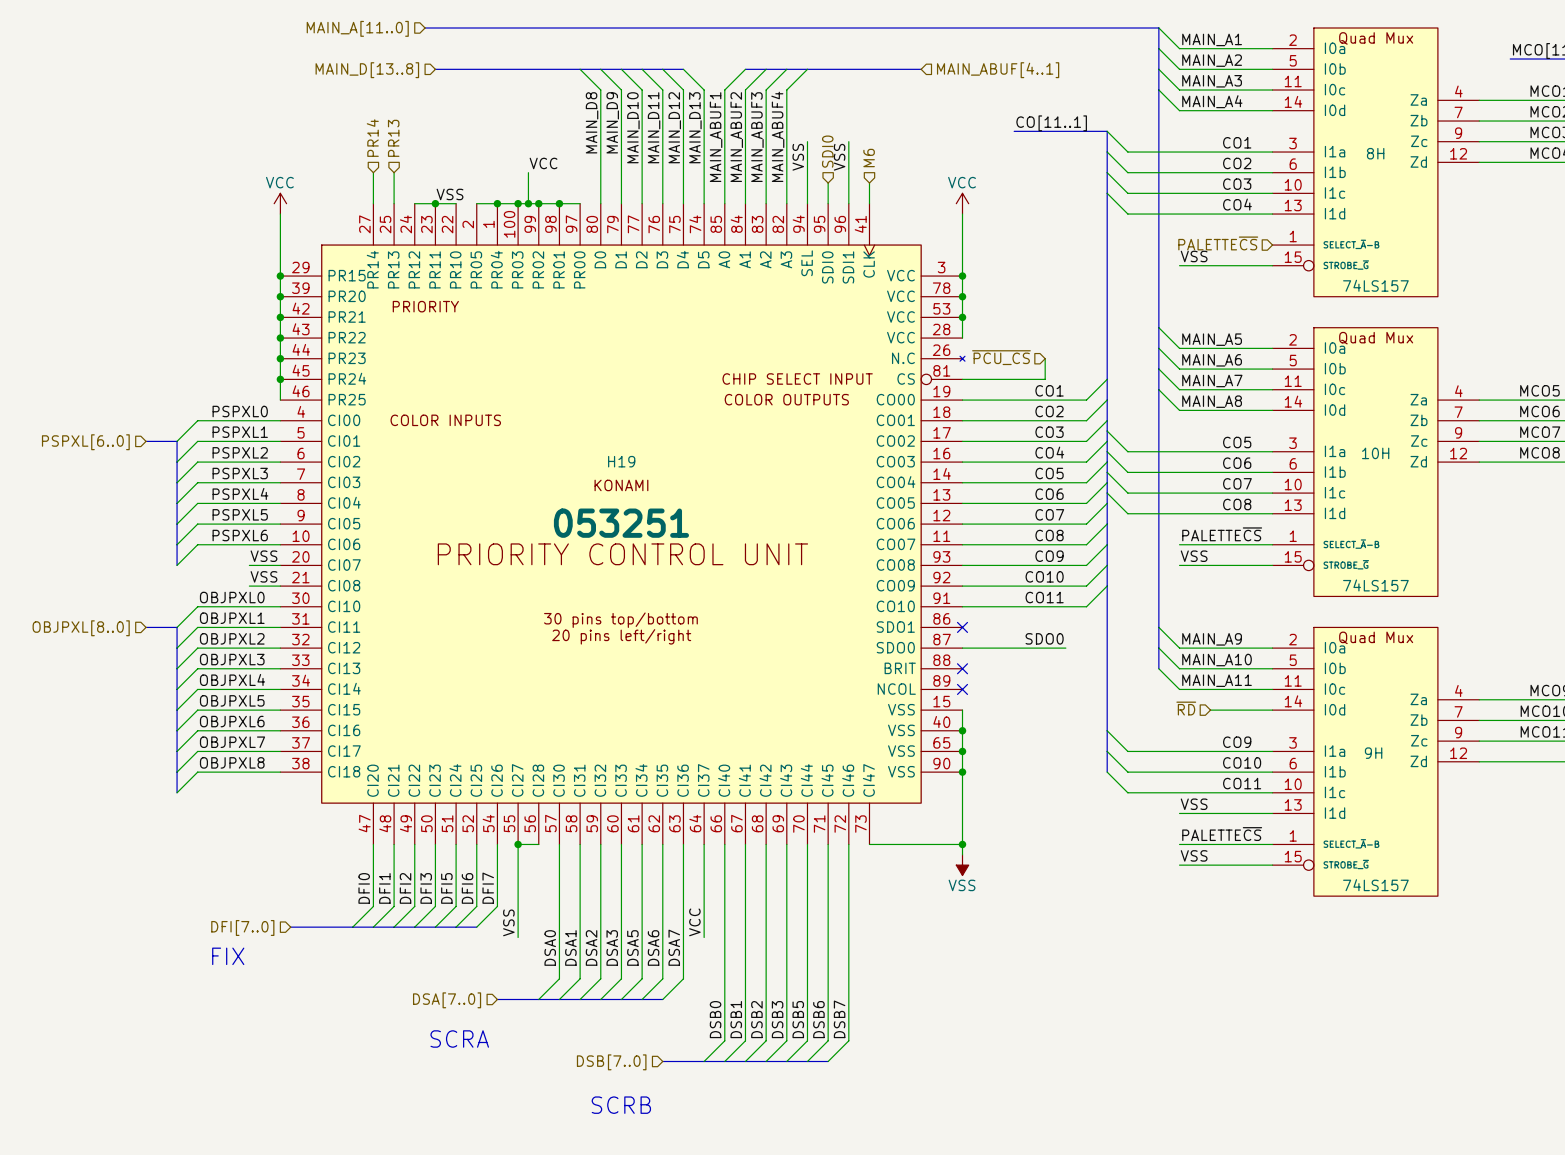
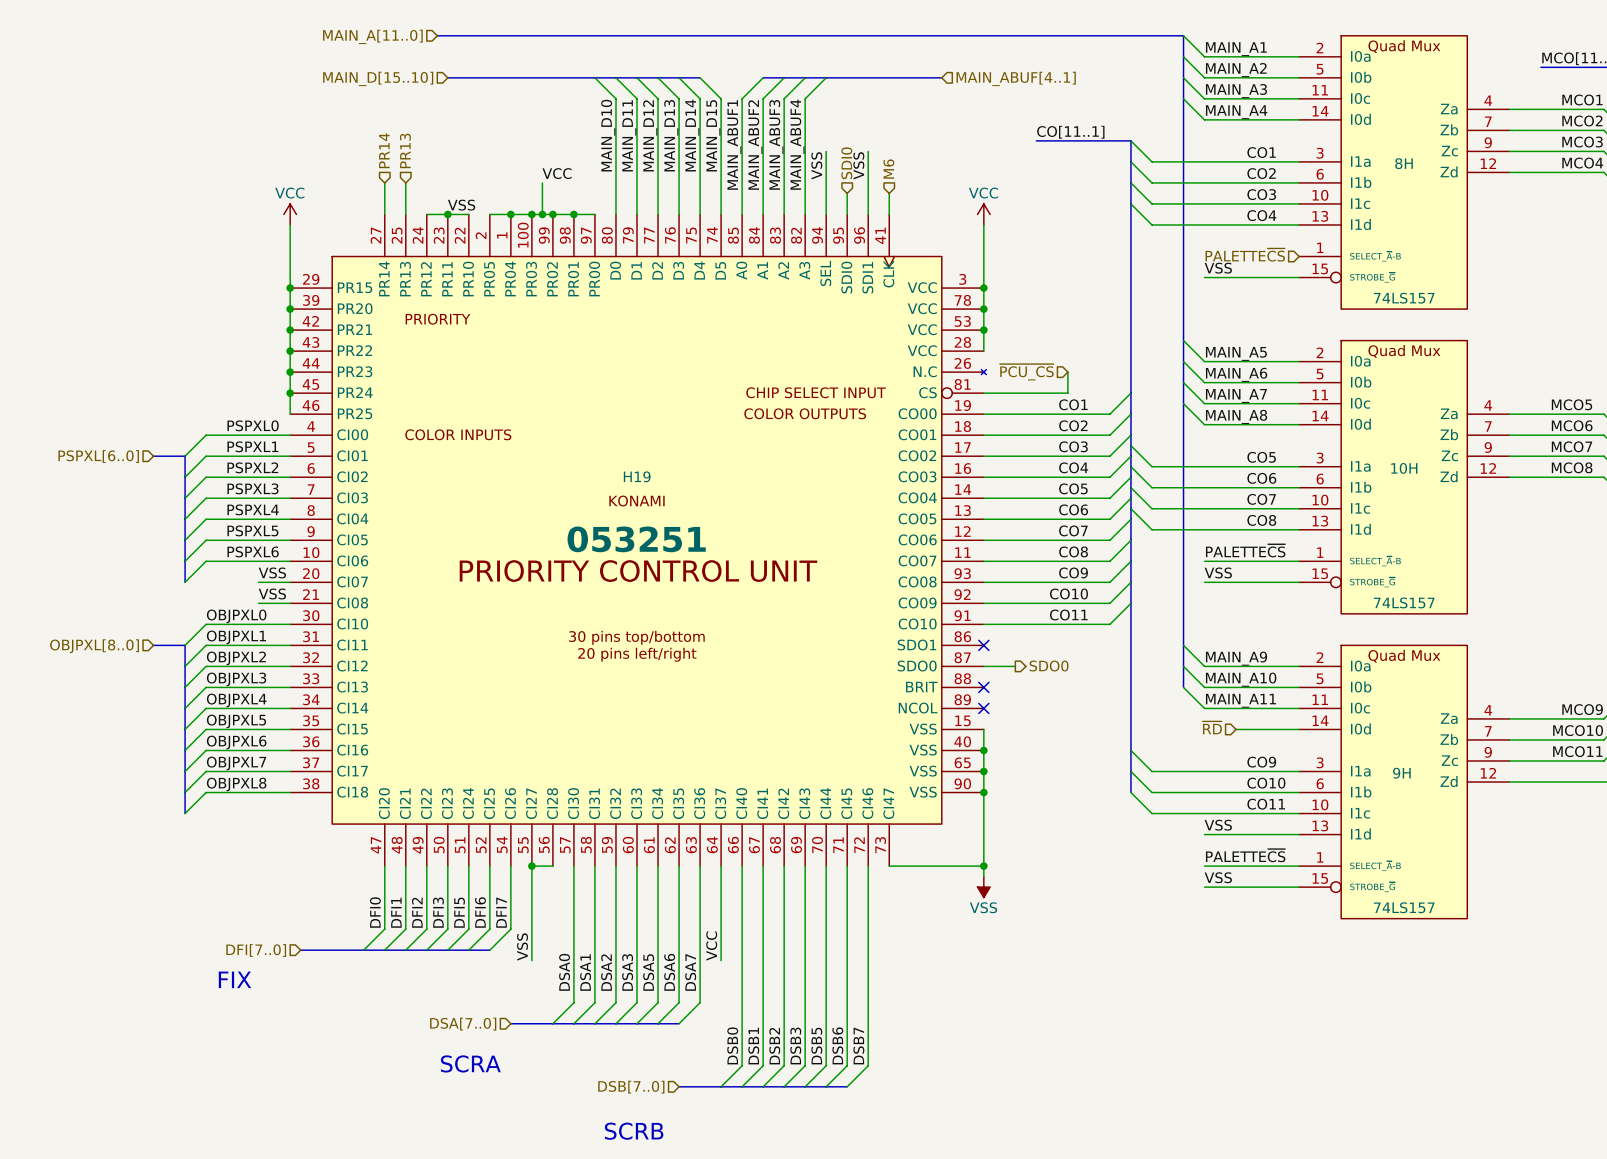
hierarchical label: MAIN_D[13..8] (367, 70) -> MAIN_D[15..10] (378, 78)
label: MAIN_D8 (592, 122) -> MAIN_D10 (608, 135)
label: MAIN_D9 (612, 122) -> MAIN_D11 (629, 135)
label: MAIN_D10 (633, 127) -> MAIN_D12 (650, 135)
label: MAIN_D11 (654, 127) -> MAIN_D13 (671, 135)
label: MAIN_D12 (674, 127) -> MAIN_D14 (692, 135)
label: MAIN_D13 (695, 127) -> MAIN_D15 (713, 135)
label: SDO0 (1044, 638) -> none
hierarchical label: none -> SDO0 (1049, 666)
wire: (993, 648) (1065, 648) -> none

